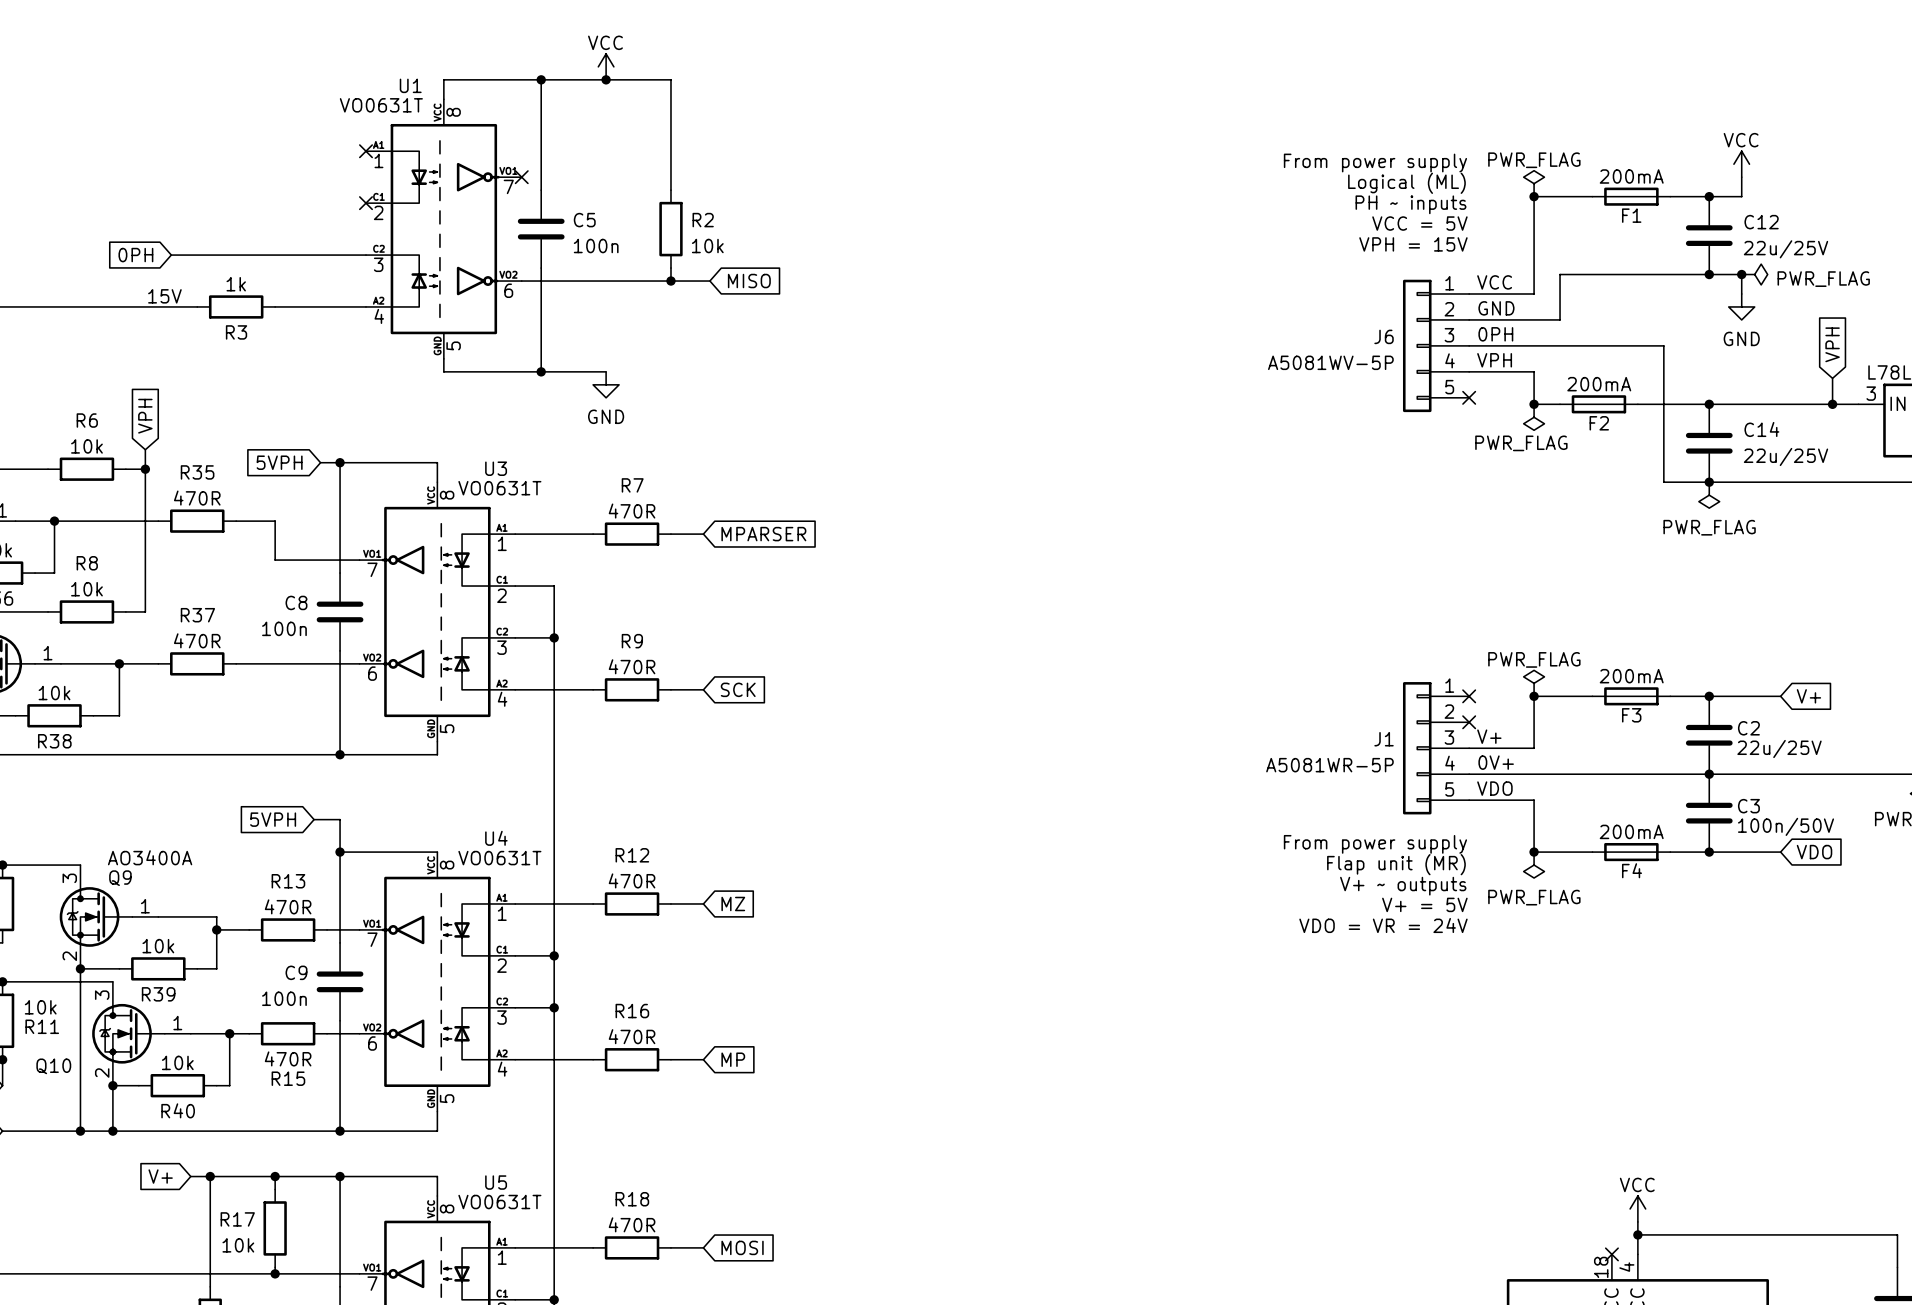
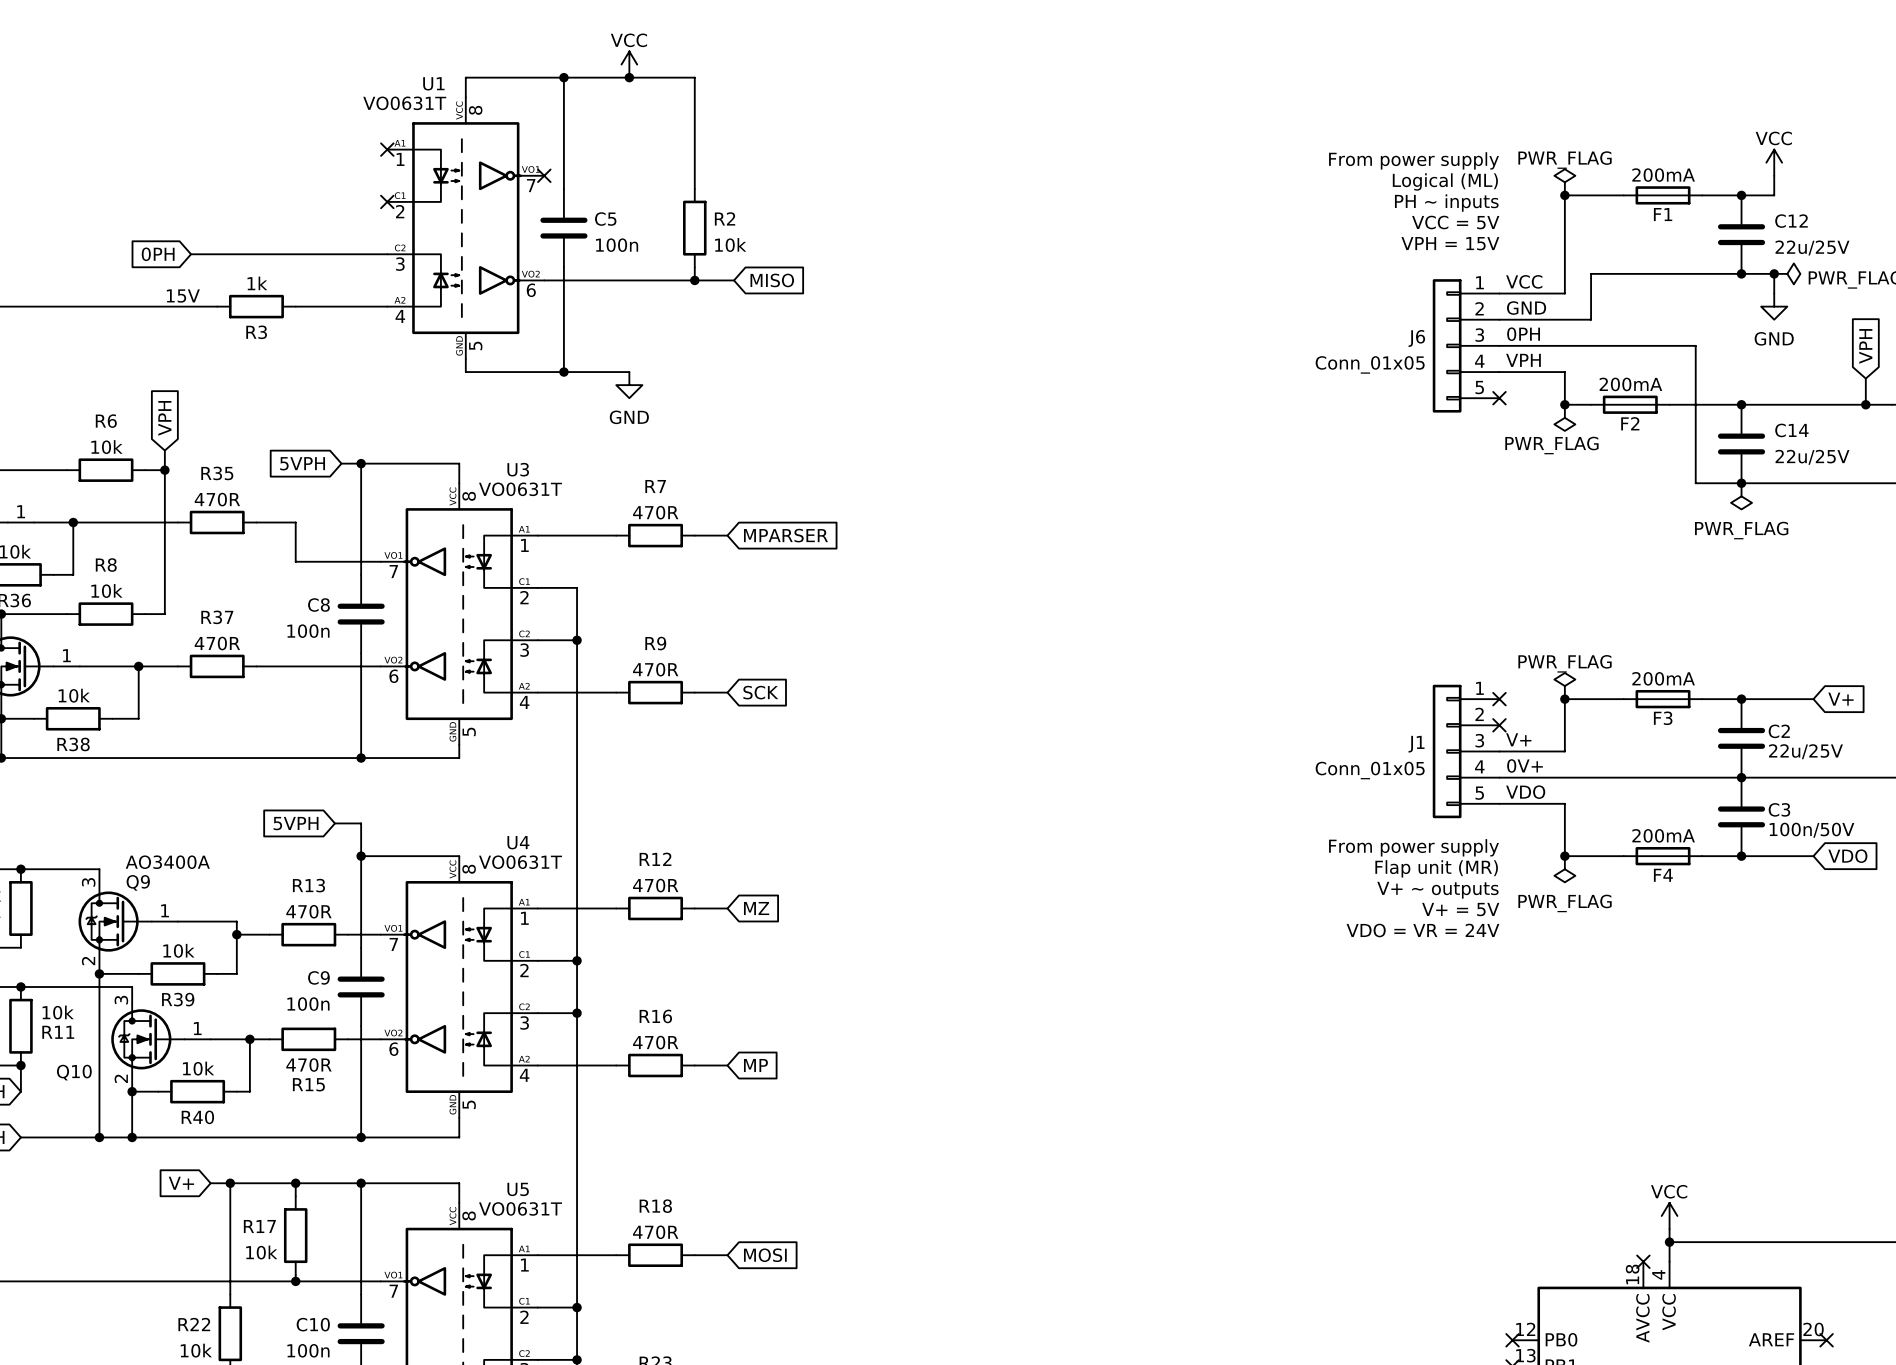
J6 value: A5081WV-5P (1330, 362) -> Conn_01x05 (1370, 364)
J1 value: A5081WR-5P (1329, 765) -> Conn_01x05 (1370, 770)

